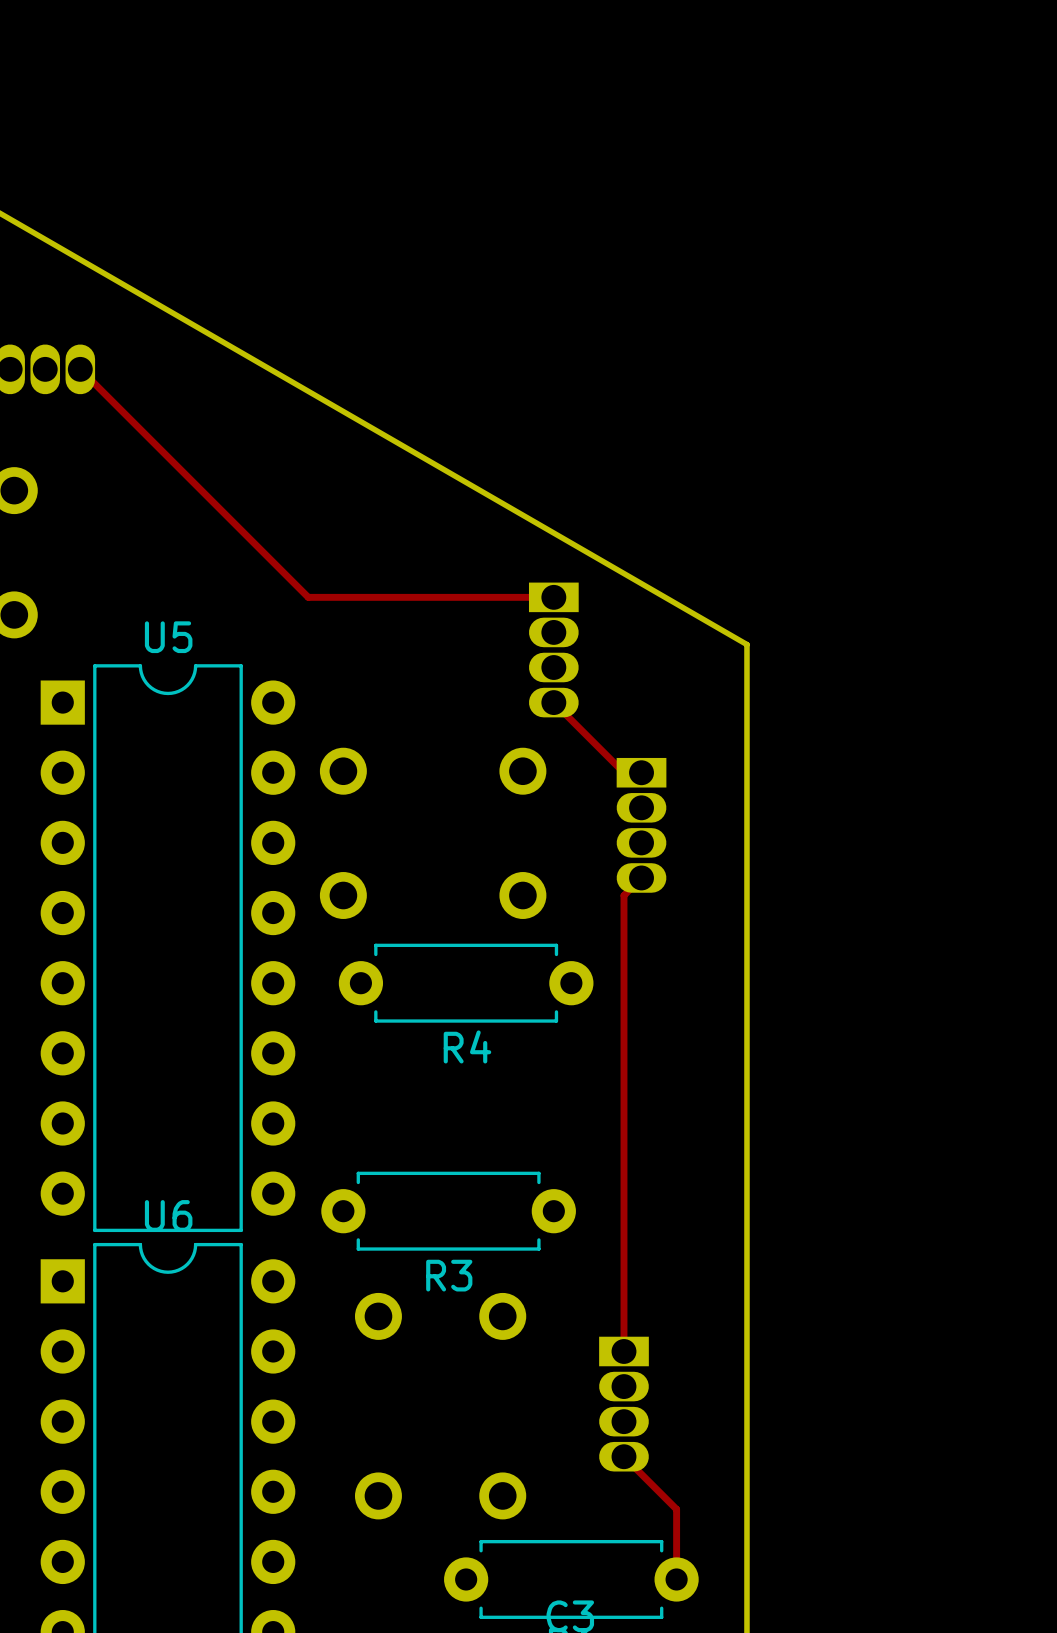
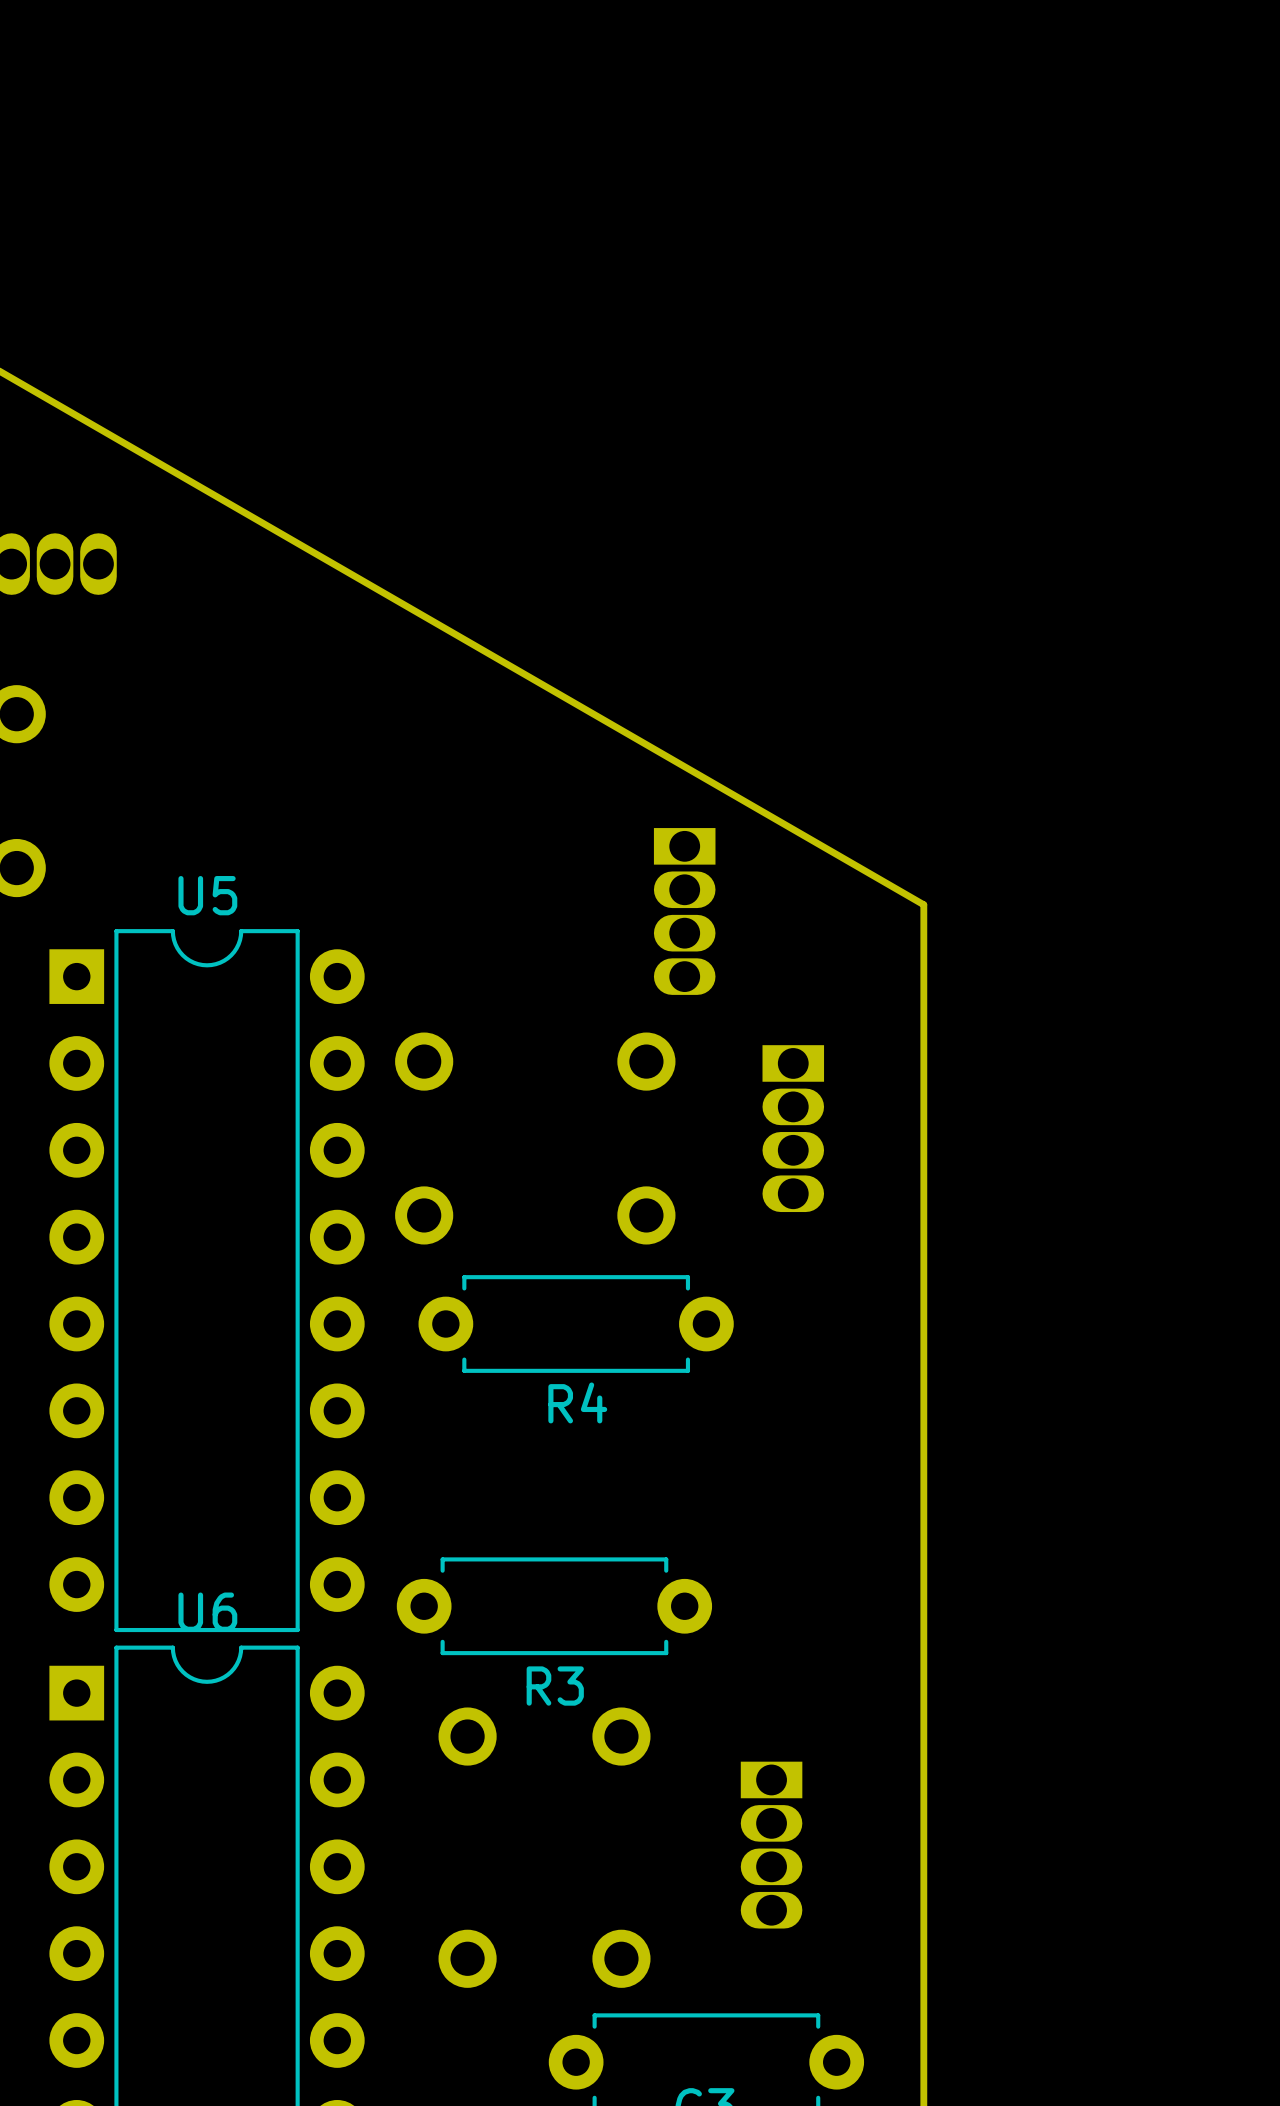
track: (80, 369) (308, 597) (553, 597) -> none
track: (553, 702) (623, 772) (641, 772) -> none
track: (641, 877) (623, 895) (623, 1351) -> none
track: (623, 1456) (676, 1509) (676, 1579) -> none

